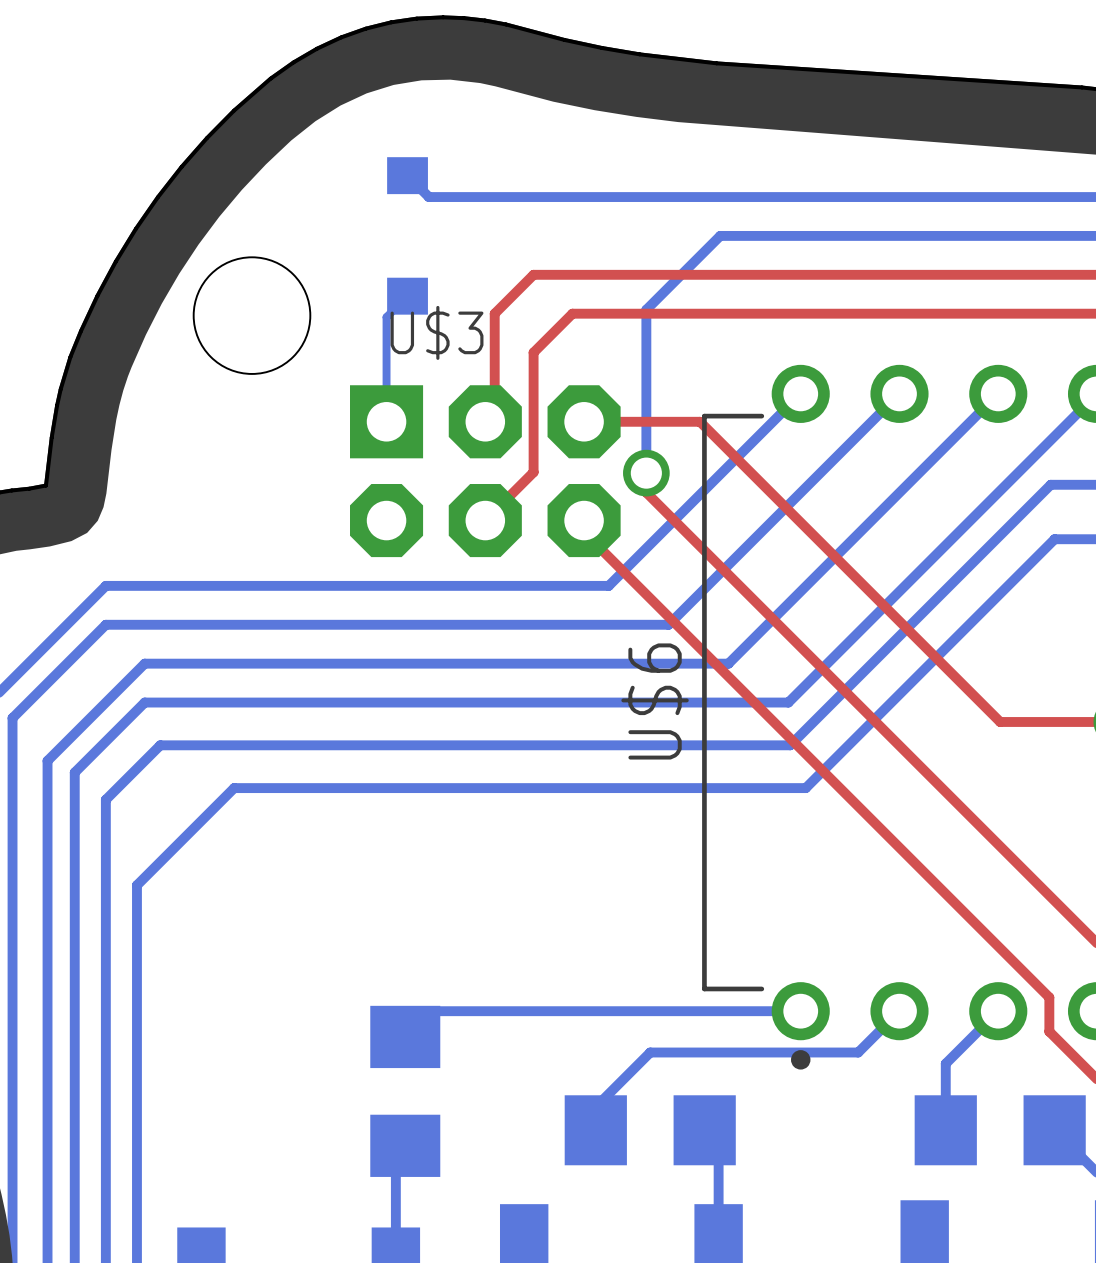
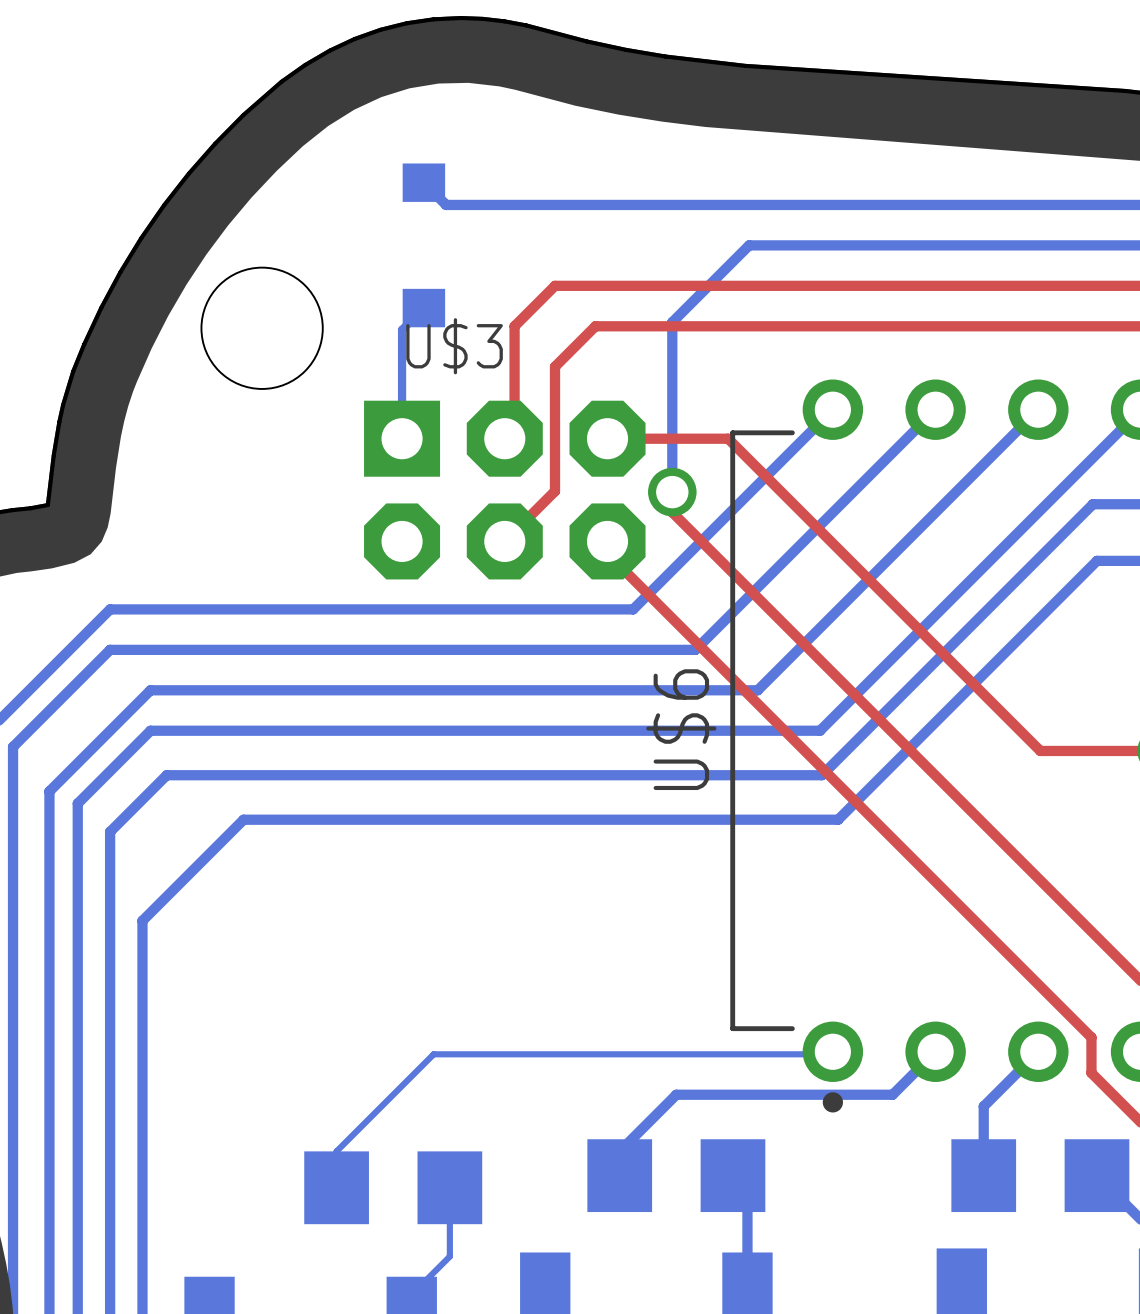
bottom track: (800, 1011) (431, 1011) (405, 1036) -> (832, 1051) (830, 1054) (433, 1054) (336, 1151) (336, 1187)
part rotation: 0° (405, 1091) -> 90° clockwise (393, 1187)
bottom track: (405, 1145) (395, 1155) (395, 1244) -> (449, 1187) (449, 1256) (411, 1294)

